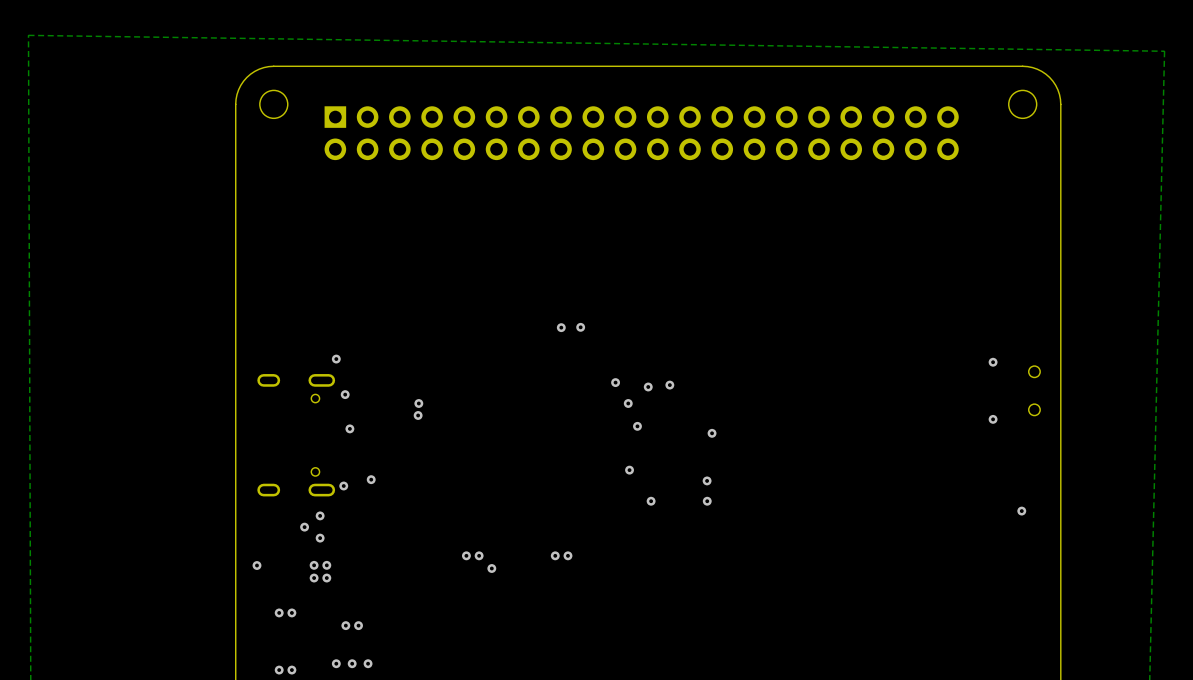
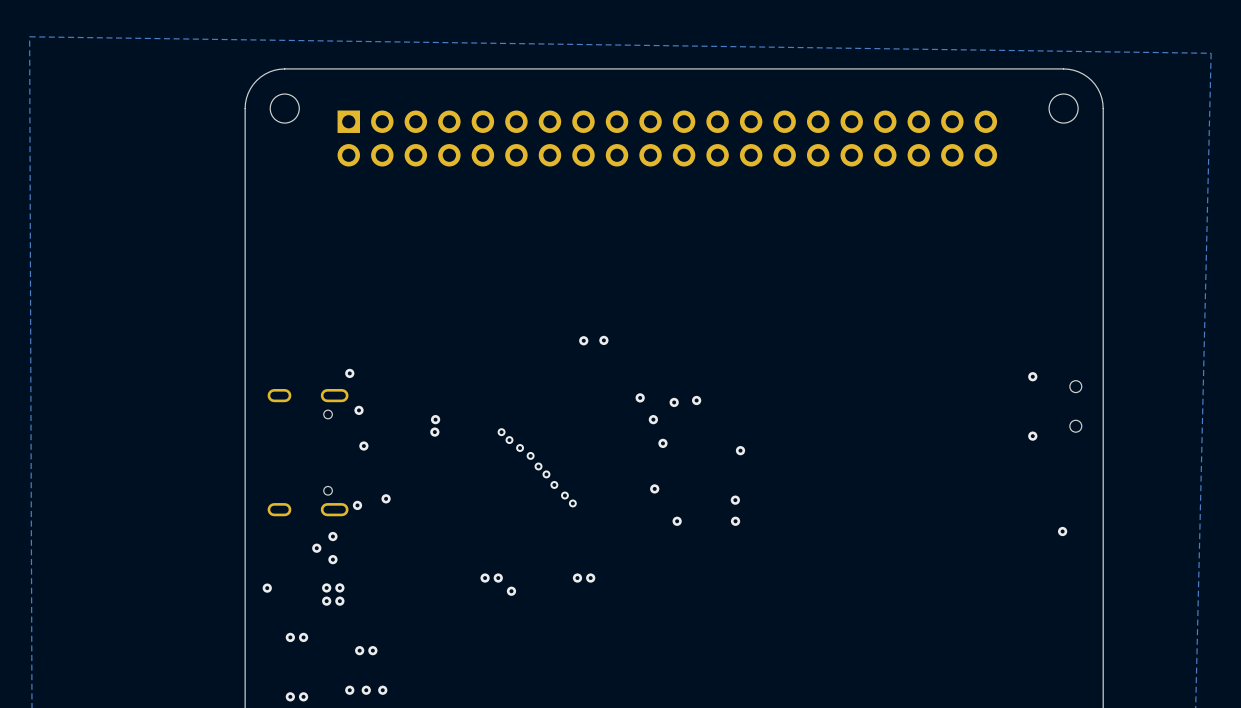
via: none -> (501, 432)
via: none -> (509, 440)
via: none -> (520, 448)
via: none -> (530, 455)
via: none -> (538, 466)
via: none -> (546, 474)
via: none -> (554, 484)
via: none -> (564, 495)
via: none -> (572, 503)

